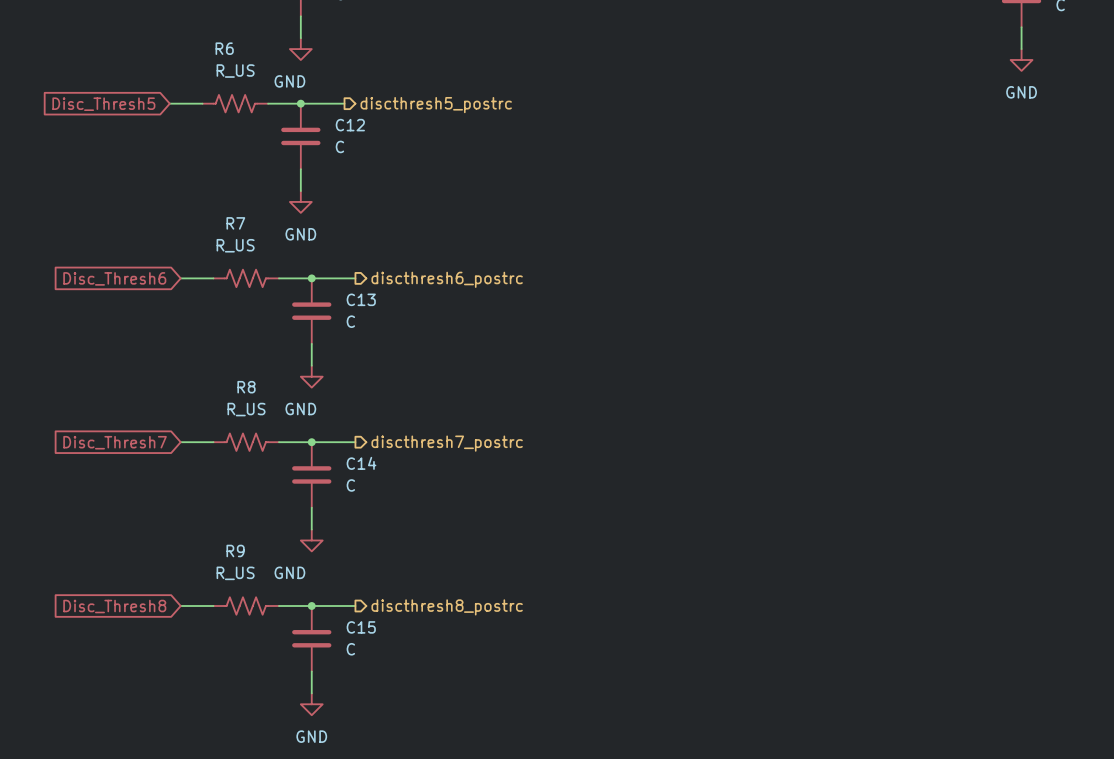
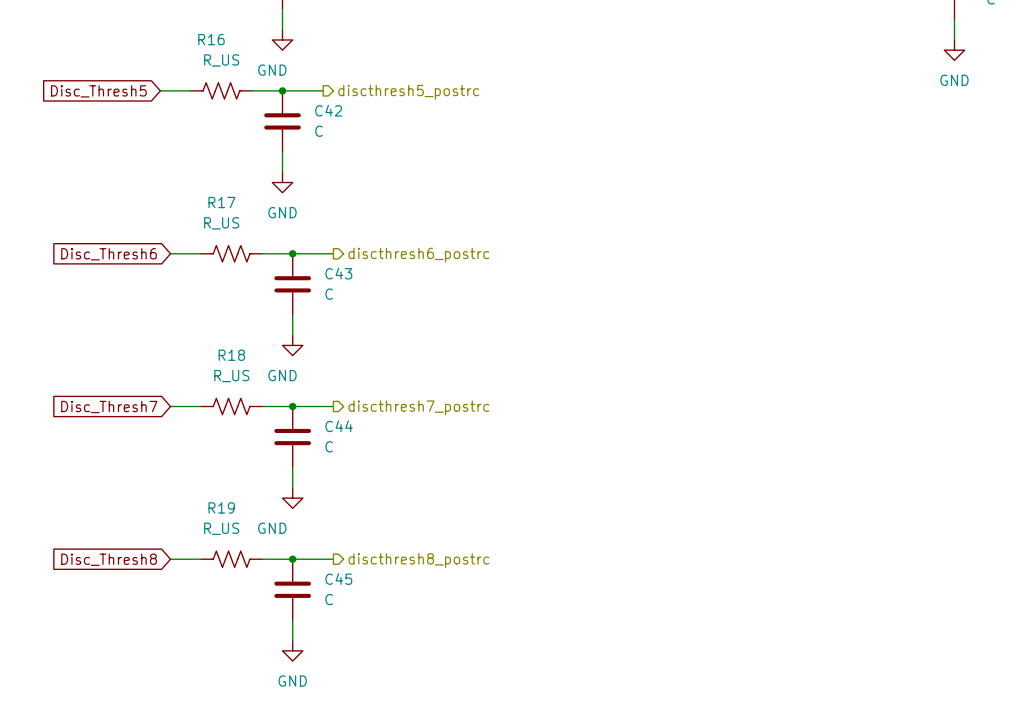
R6 name: R6 (224, 48) -> R16 (211, 39)
C12 name: C12 (350, 125) -> C42 (328, 110)
R7 name: R7 (235, 223) -> R17 (221, 202)
C13 name: C13 (361, 299) -> C43 (338, 273)
R8 name: R8 (246, 387) -> R18 (231, 355)
C14 name: C14 (361, 463) -> C44 (339, 426)
R9 name: R9 (235, 550) -> R19 (221, 507)
C15 name: C15 (361, 627) -> C45 (338, 578)

